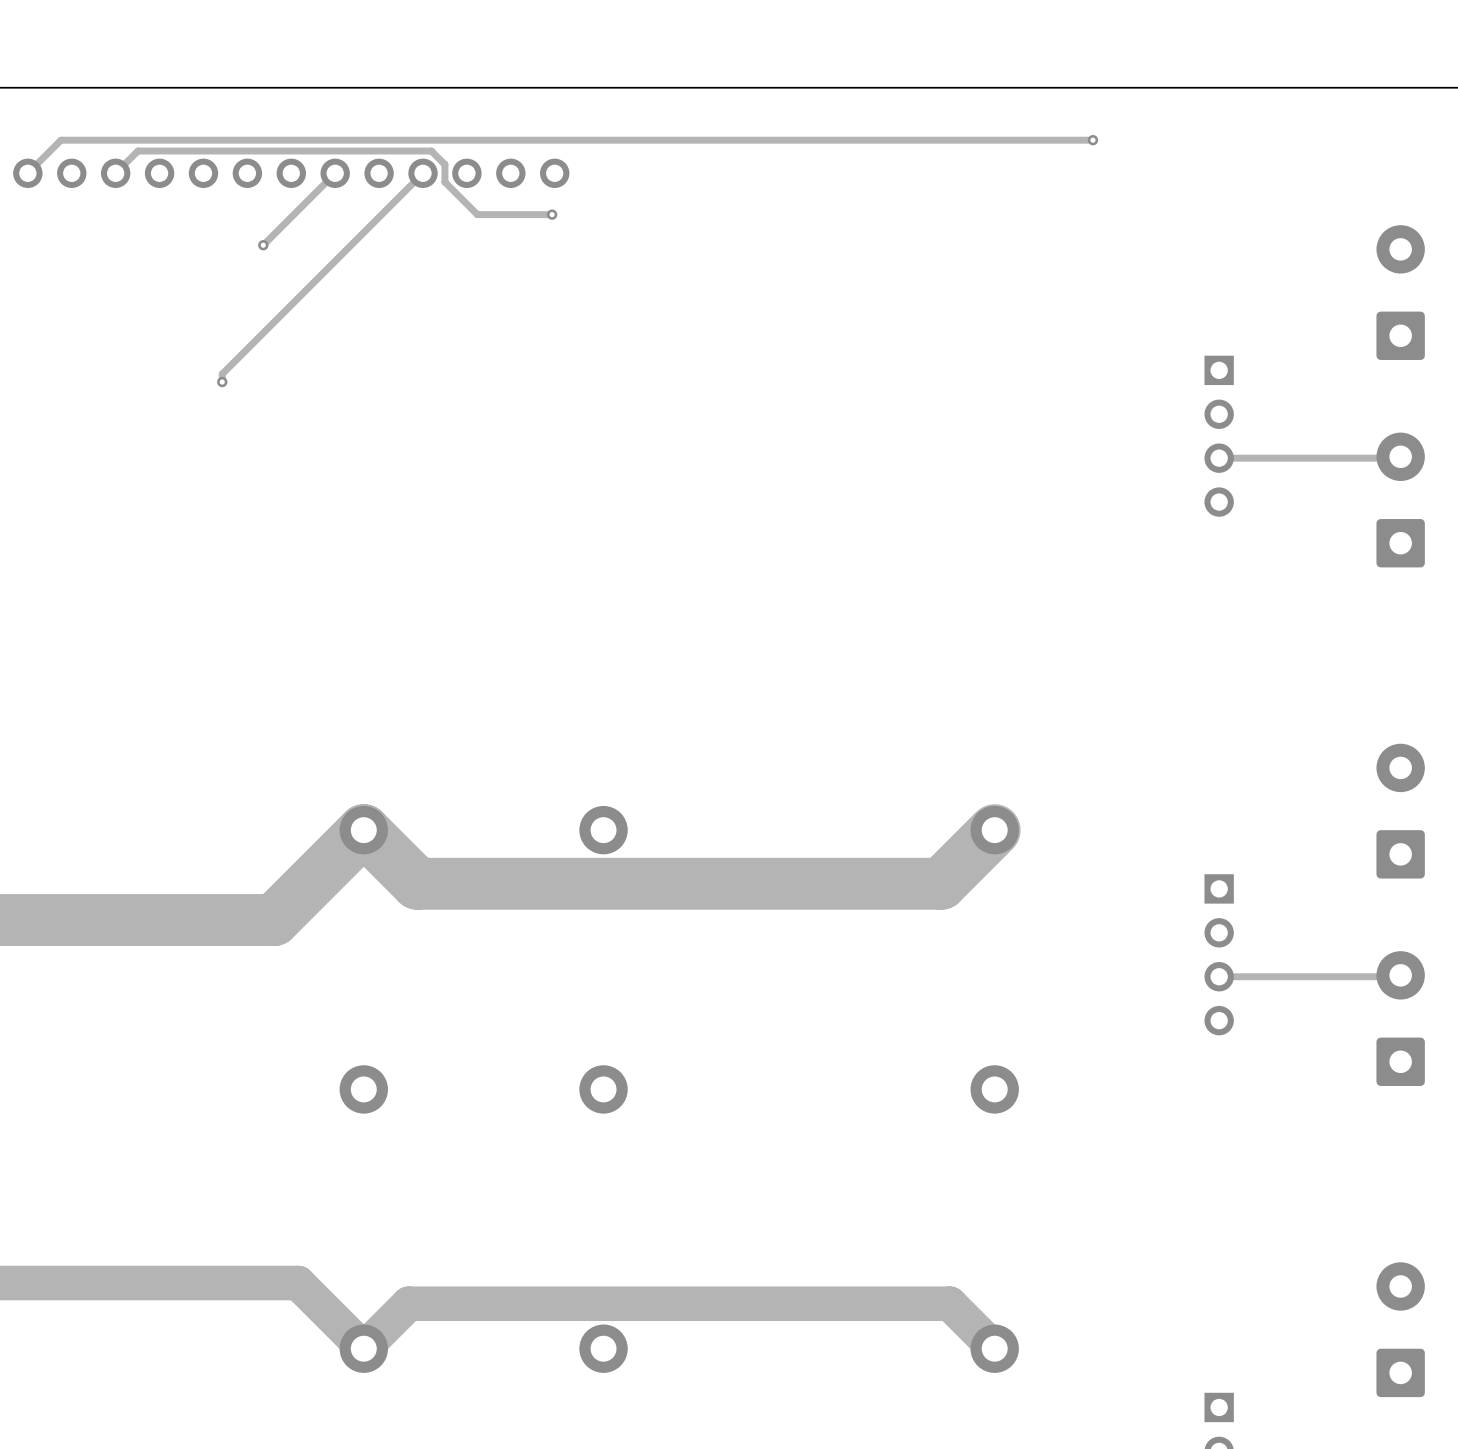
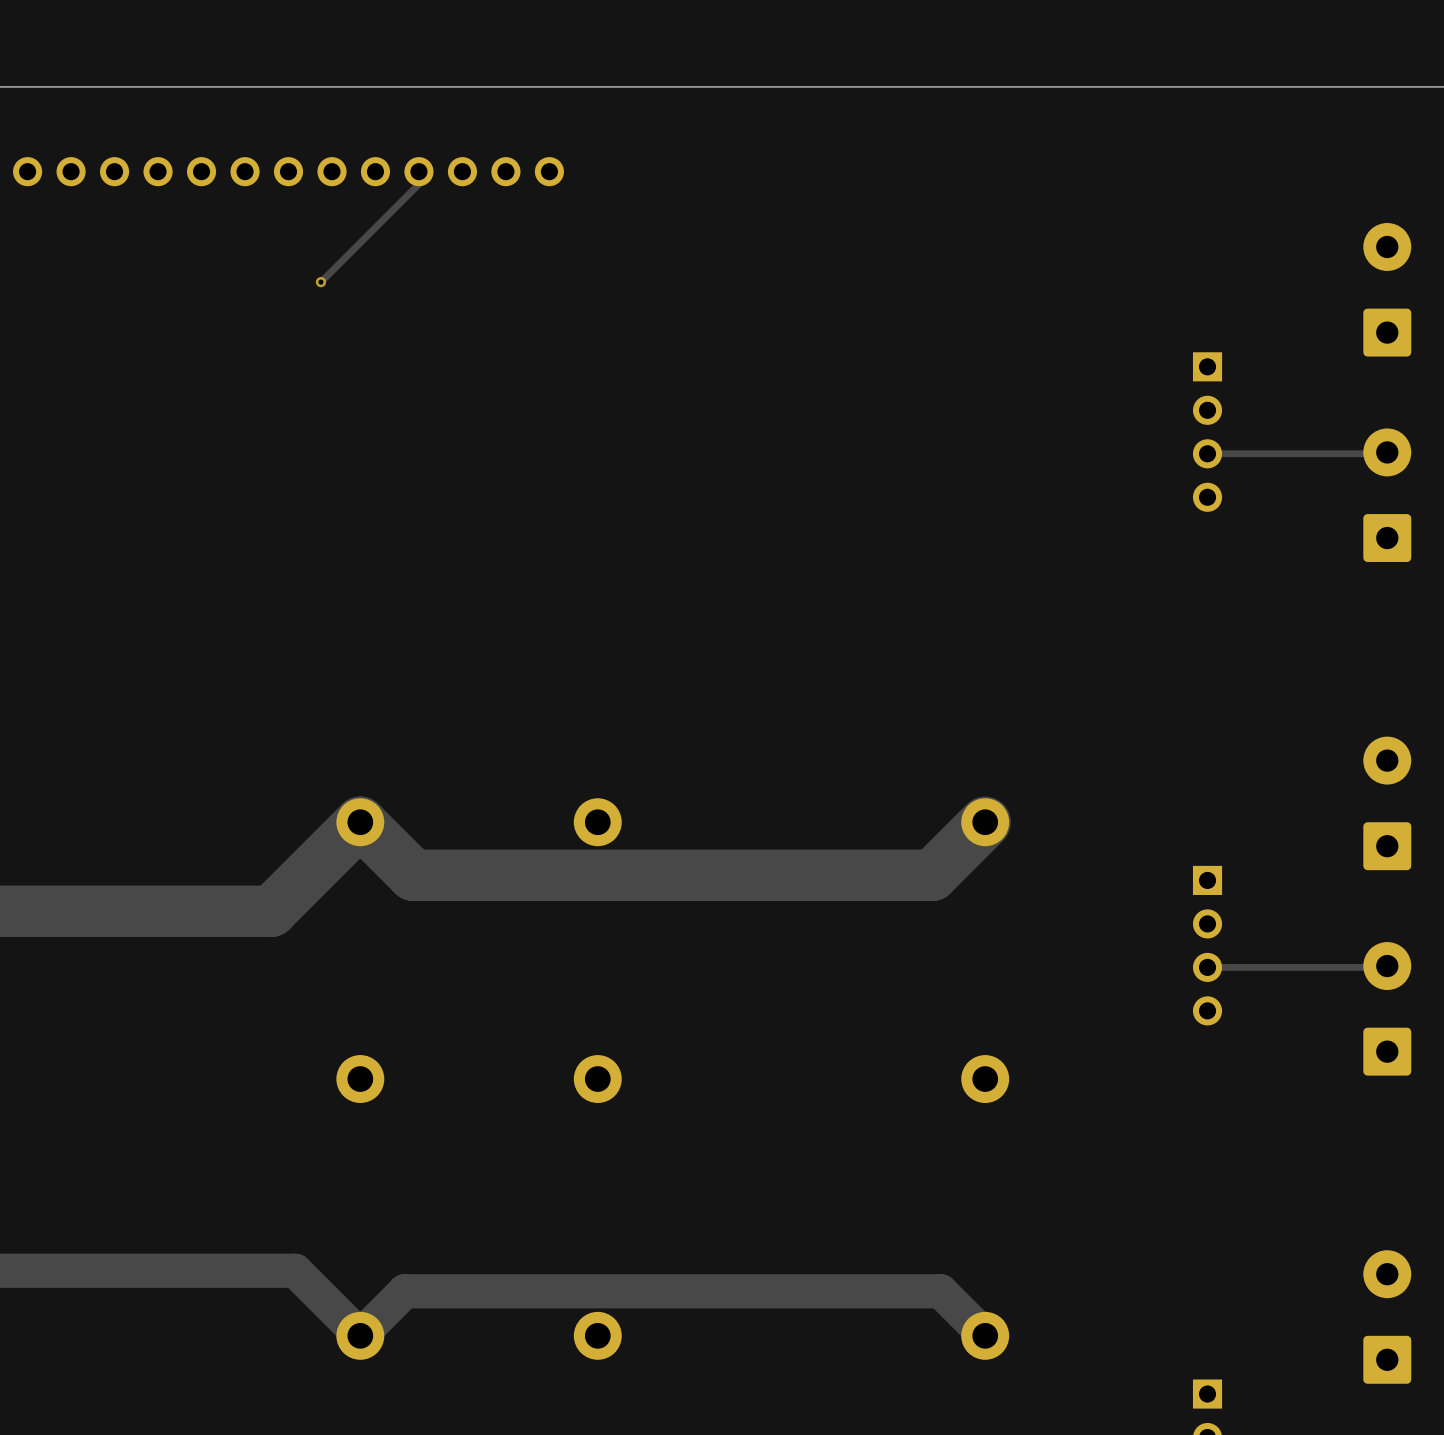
track: (1092, 140) (60, 140) (27, 173) -> none
via: (1092, 140) -> none
track: (115, 173) (137, 151) (431, 151) (444, 164) (444, 182) (477, 214) (552, 214) -> none
track: (335, 173) (263, 245) -> none
track: (423, 173) (222, 374) (222, 382) -> (418, 171) (418, 184) (320, 282)
via: (552, 214) -> none
via: (263, 245) -> none
via: none -> (320, 282)
via: (222, 382) -> none

